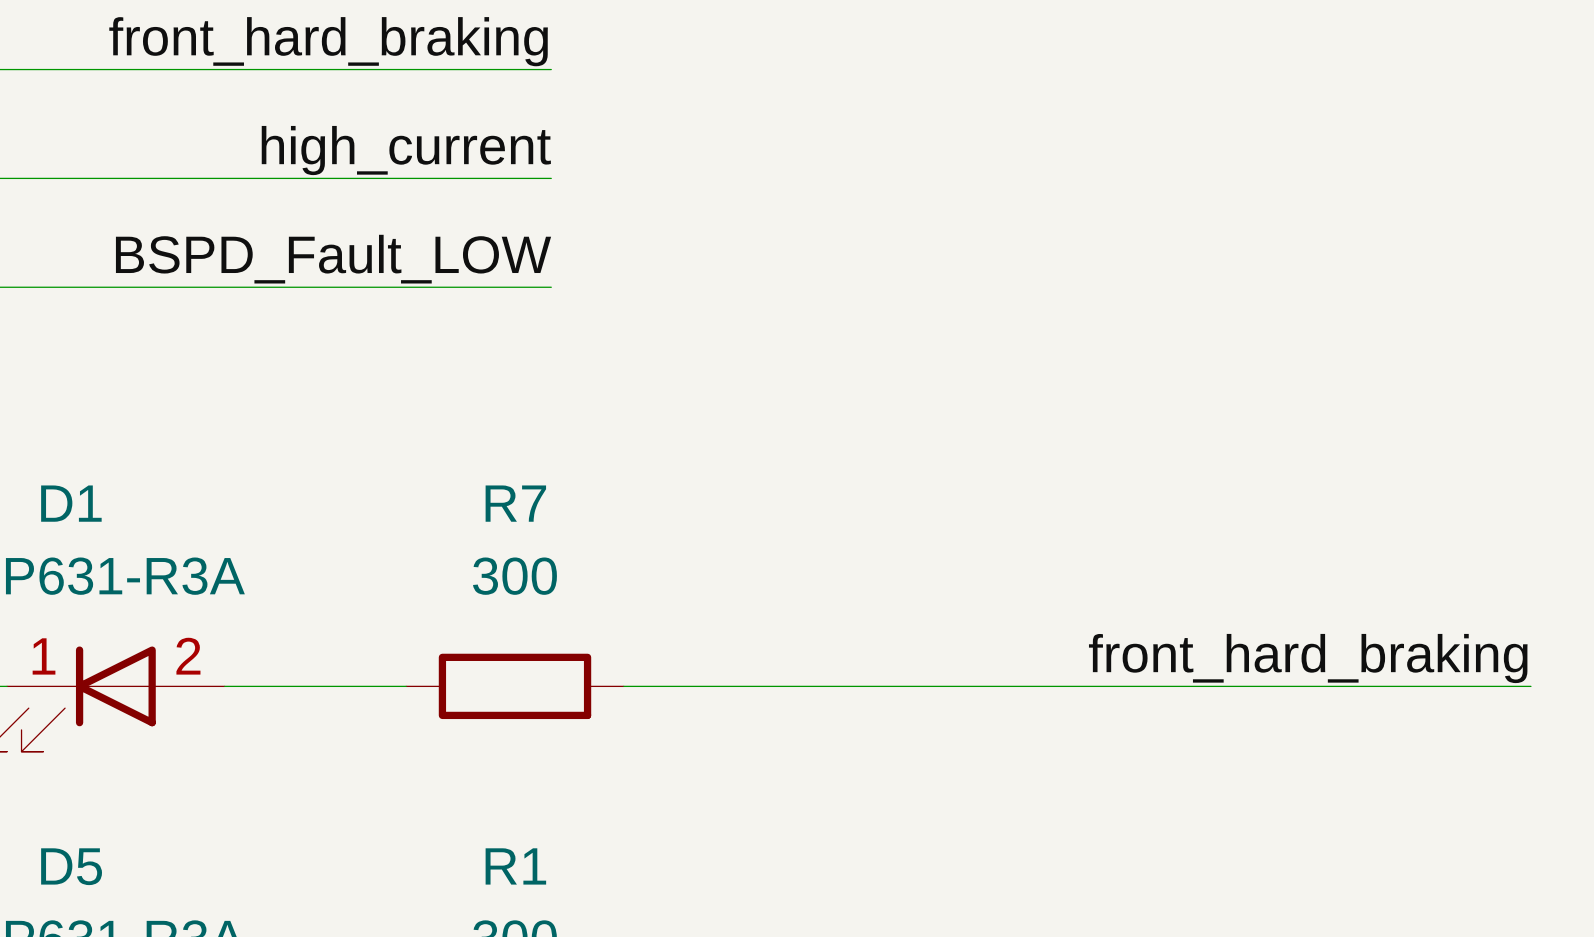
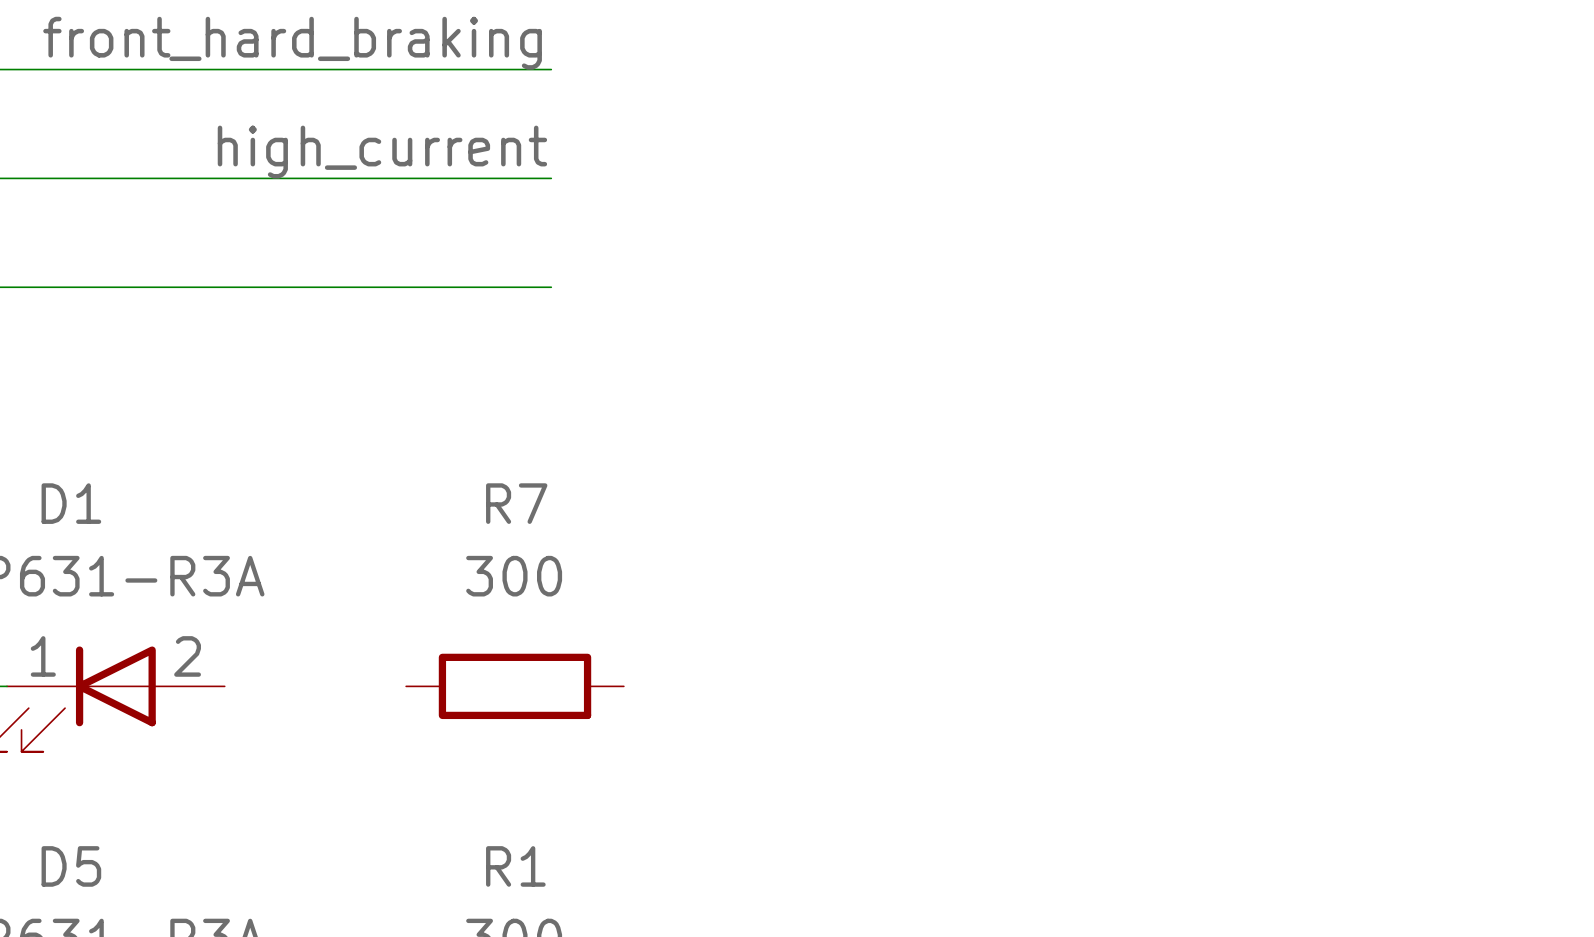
label: BSPD_Fault_LOW (333, 259) -> none
label: front_hard_braking (1308, 658) -> none
wire: (224, 686) (406, 686) -> none
wire: (623, 686) (1530, 686) -> none

